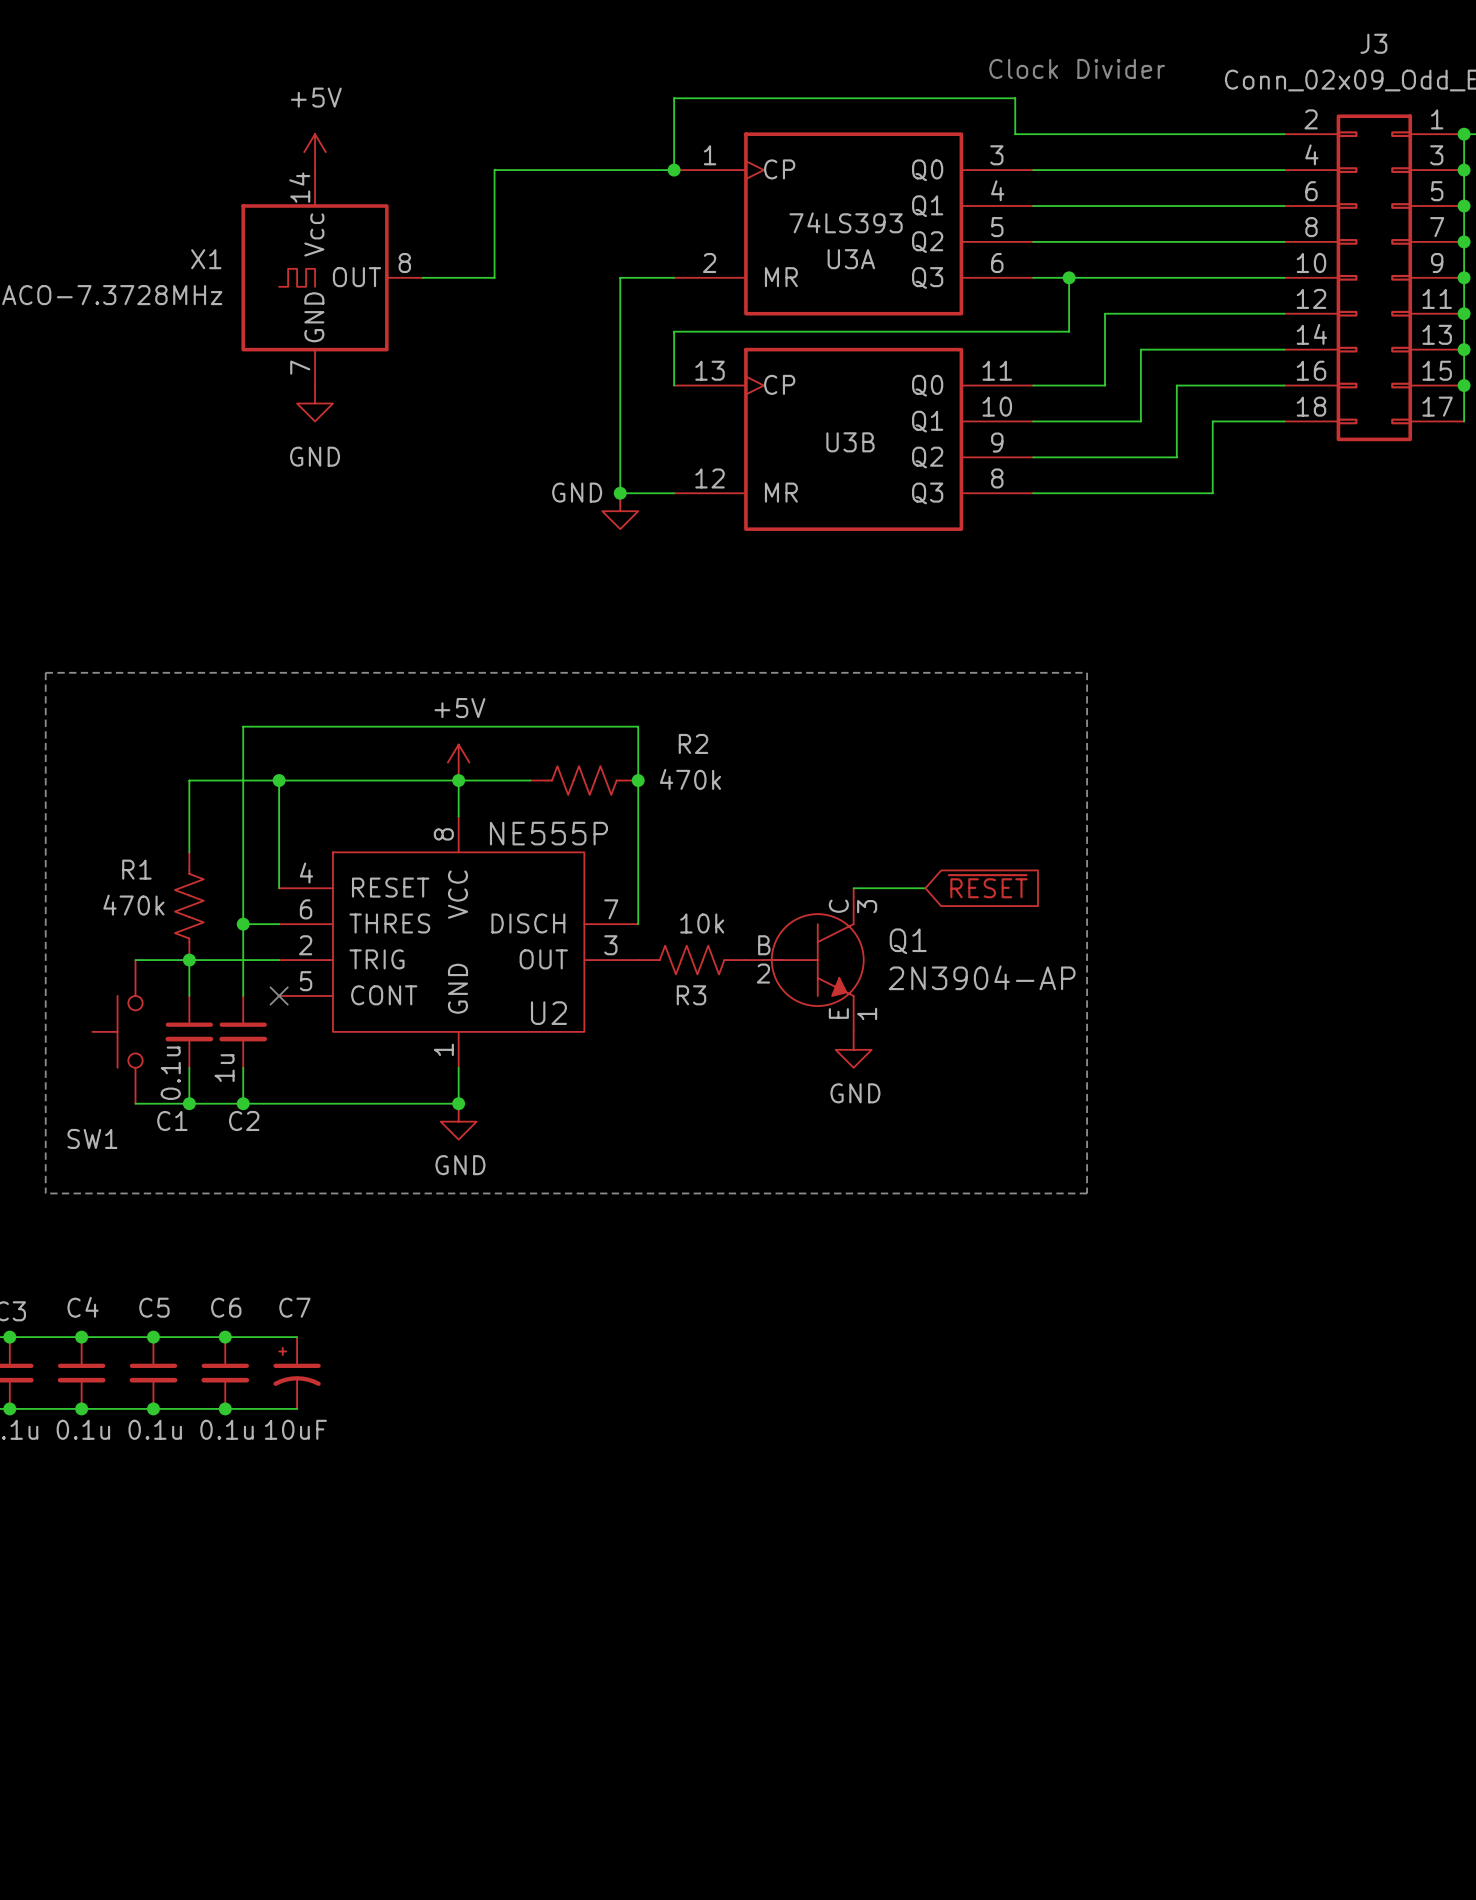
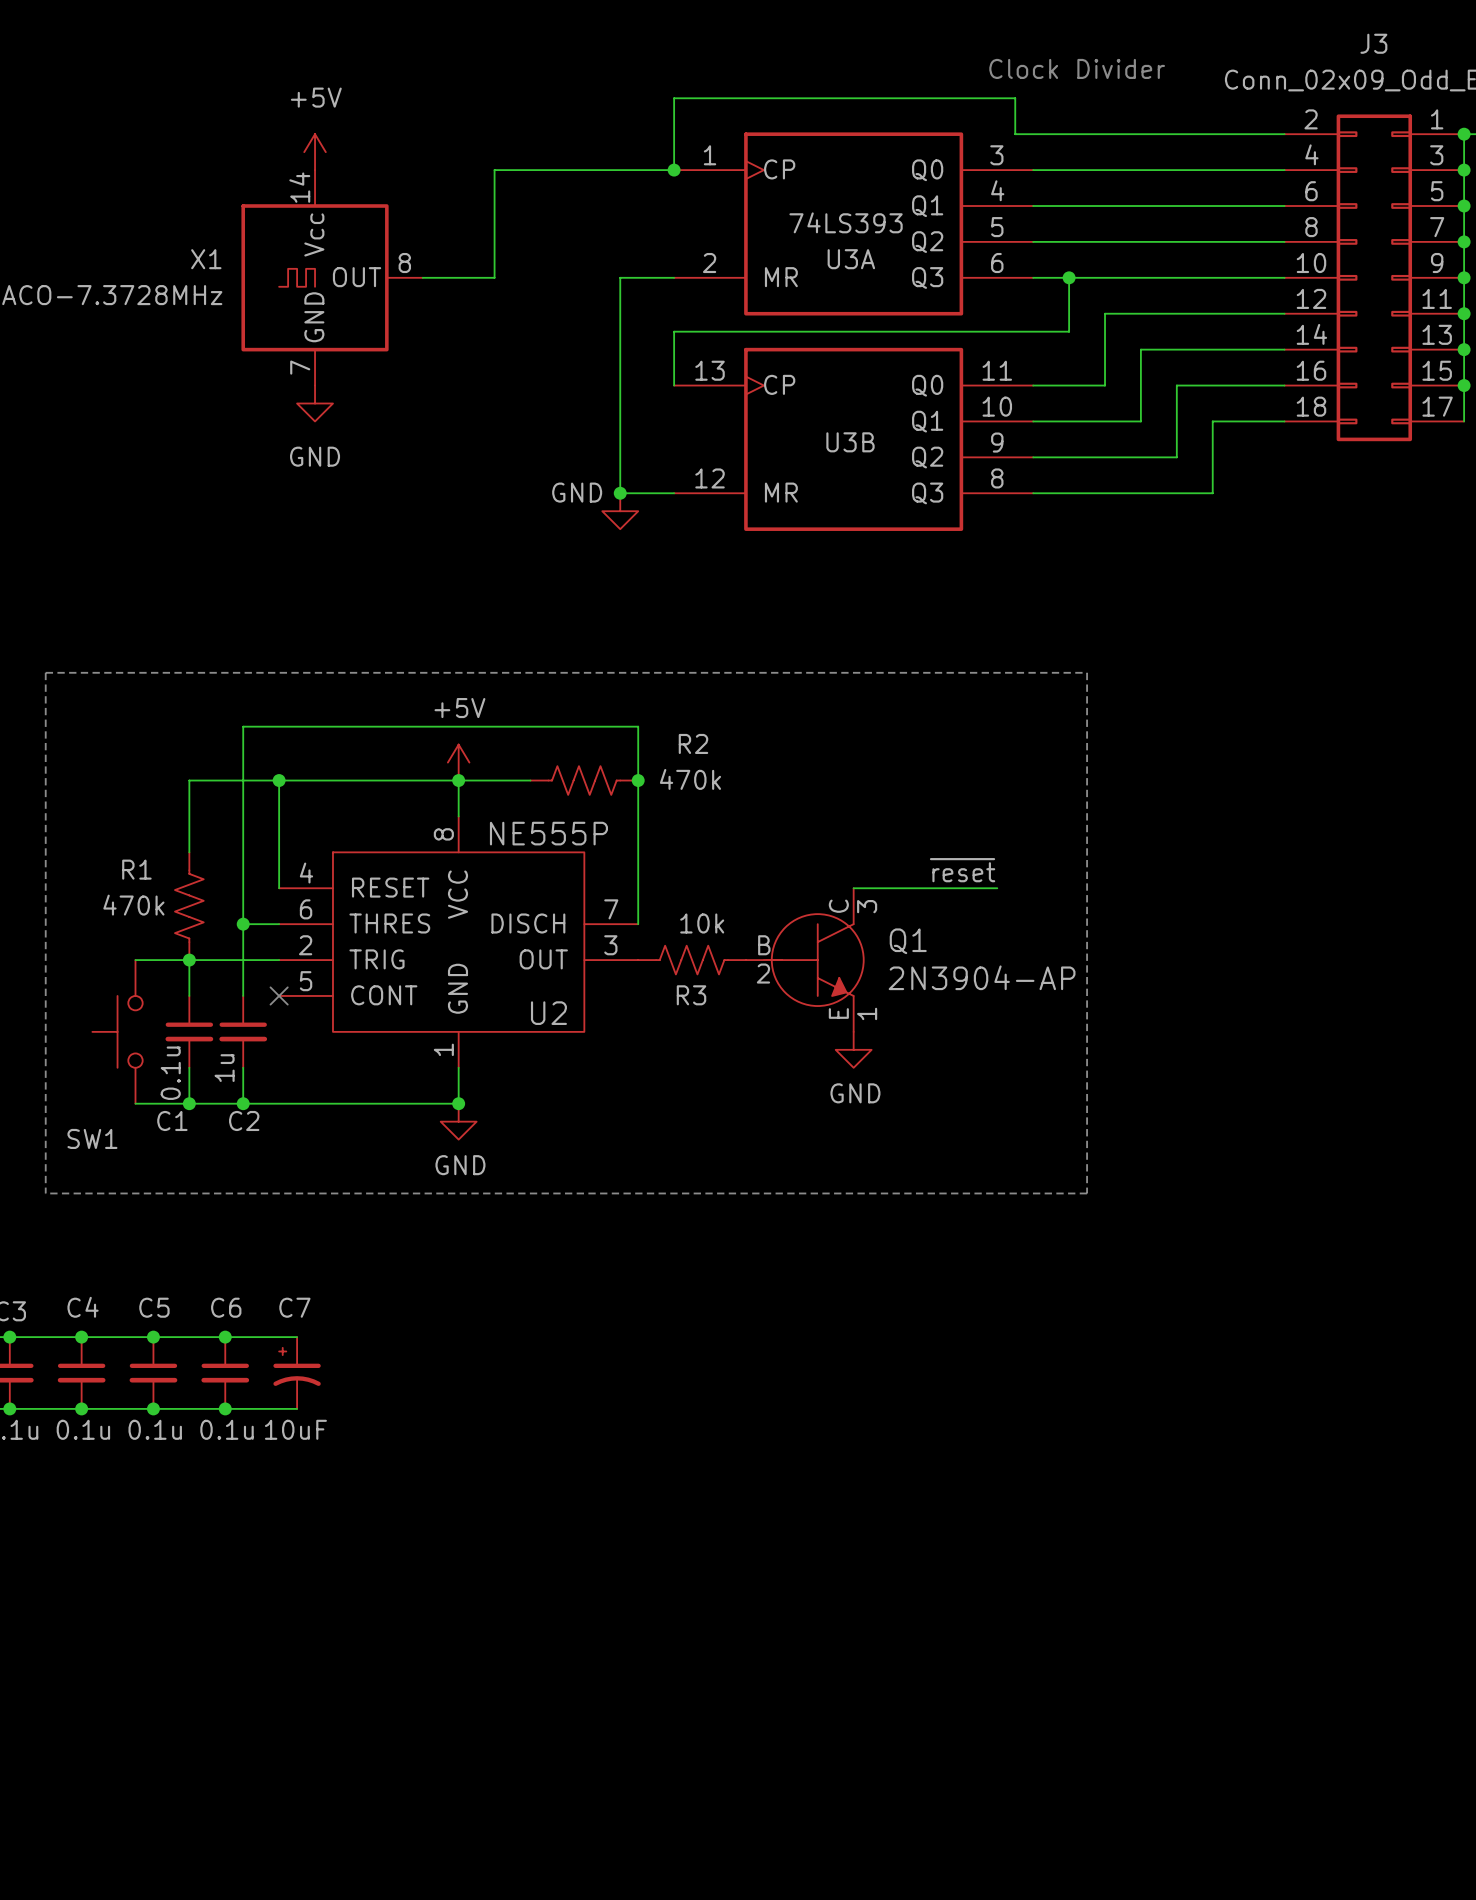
label: none -> ~{reset} (962, 870)
global label: ~{RESET} (987, 886) -> none
wire: none -> (925, 888) (997, 888)

